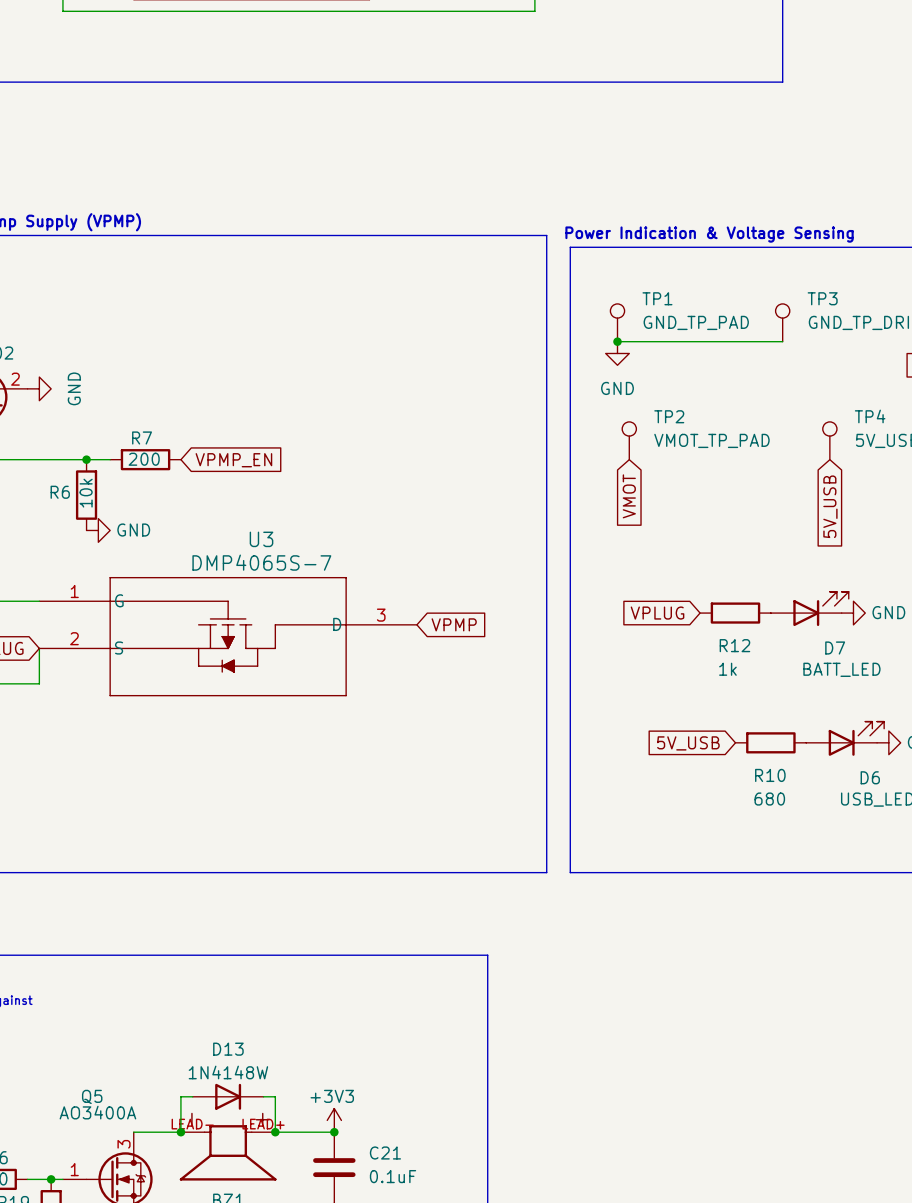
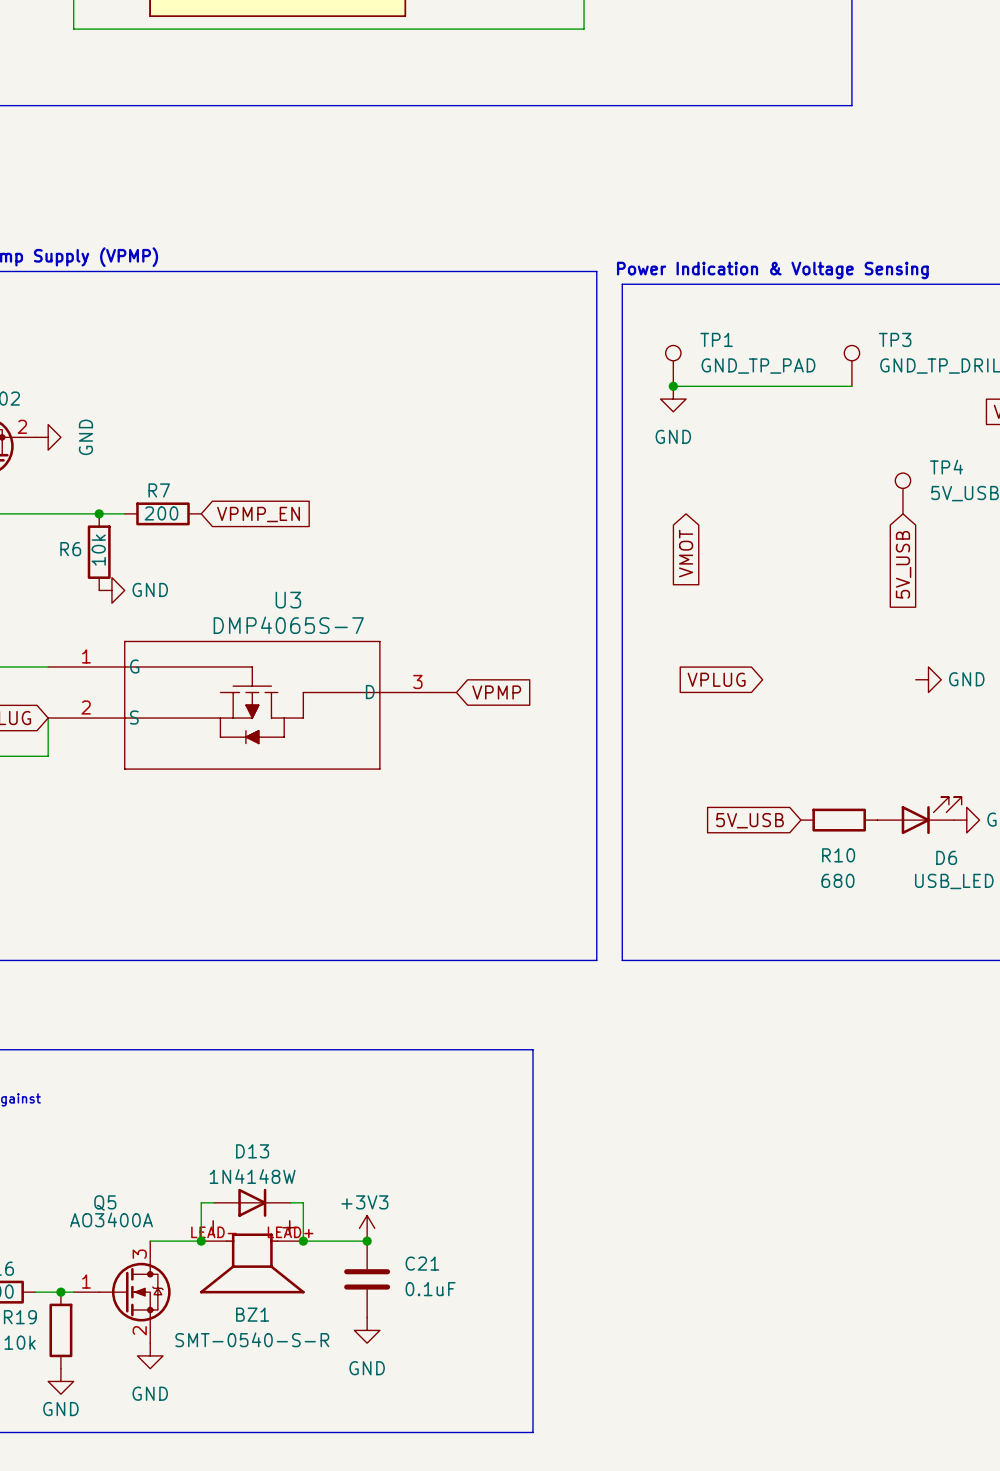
TP2: VMOT_TP_PAD (629, 440) -> none
D7: BATT_LED (809, 608) -> none
R12: 1k (735, 613) -> none

